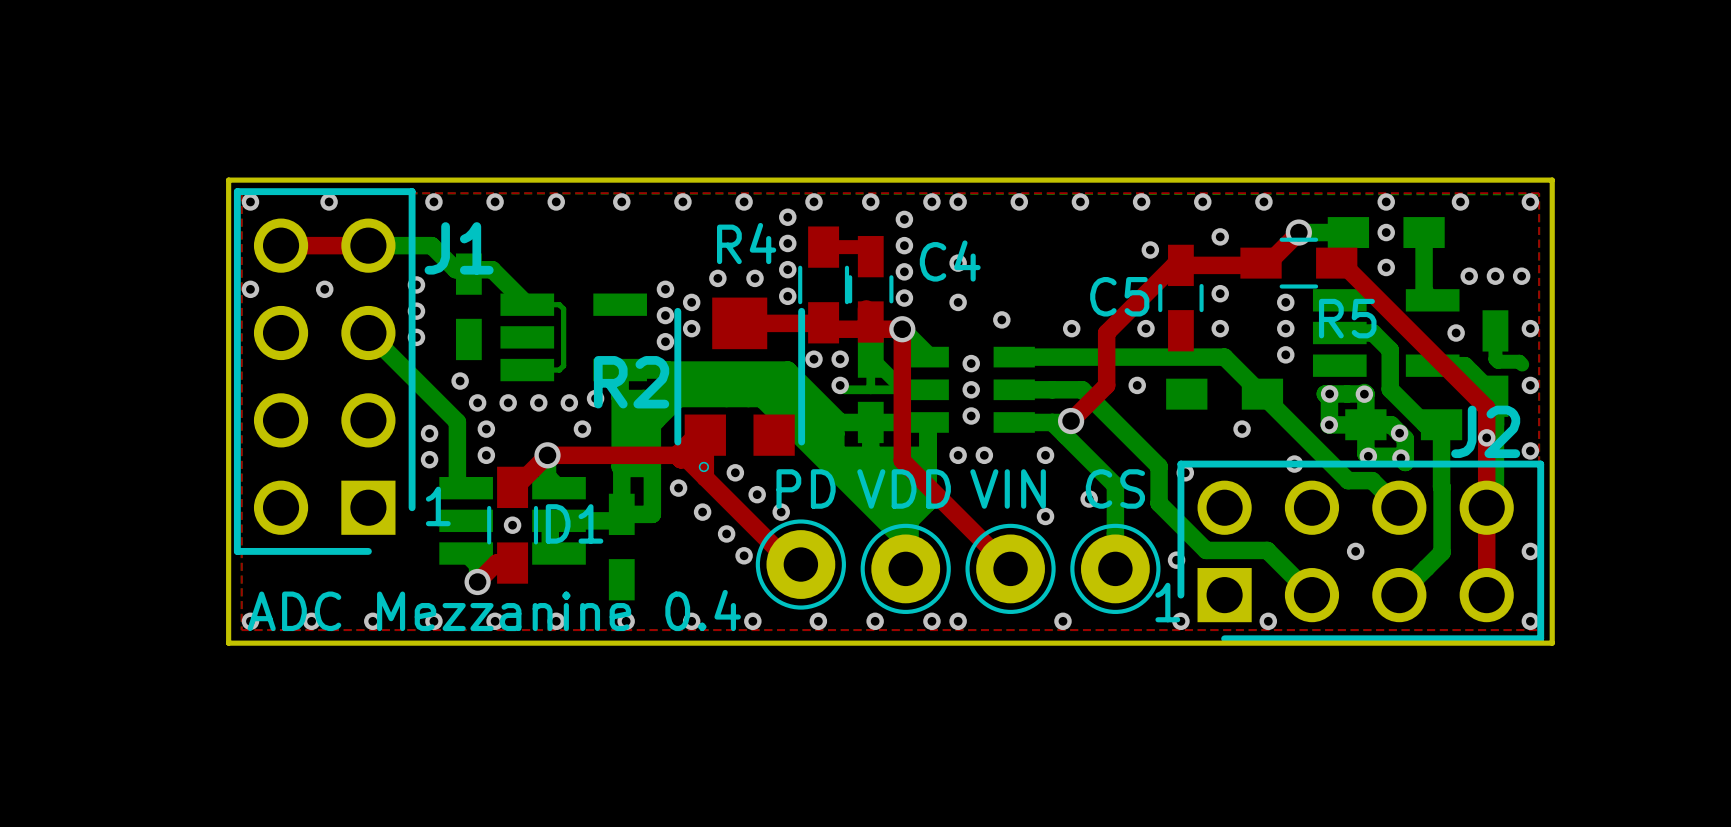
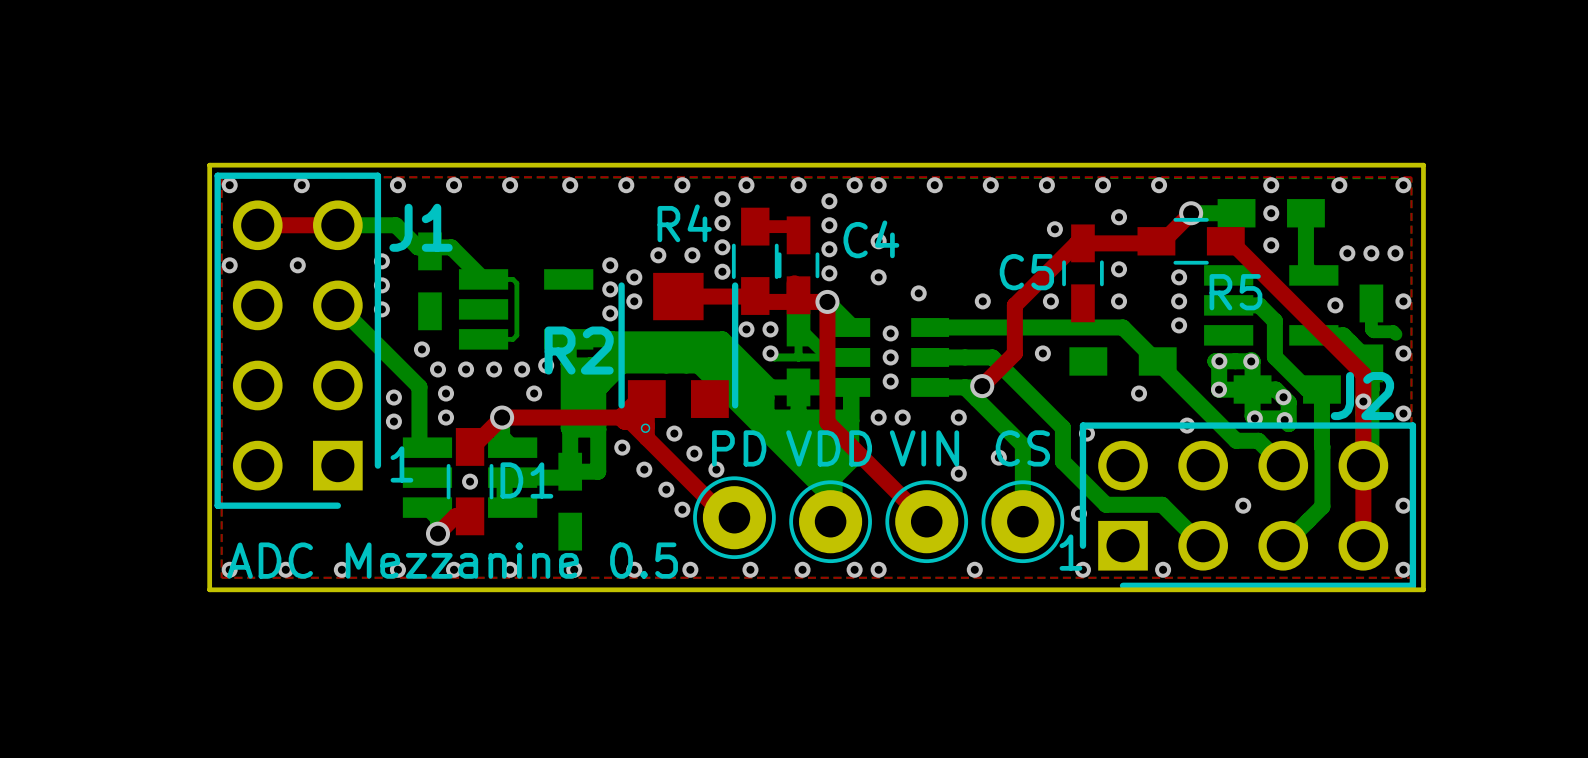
text: ADC Mezzanine 0.4 (494, 610) -> ADC Mezzanine 0.5 (452, 560)

